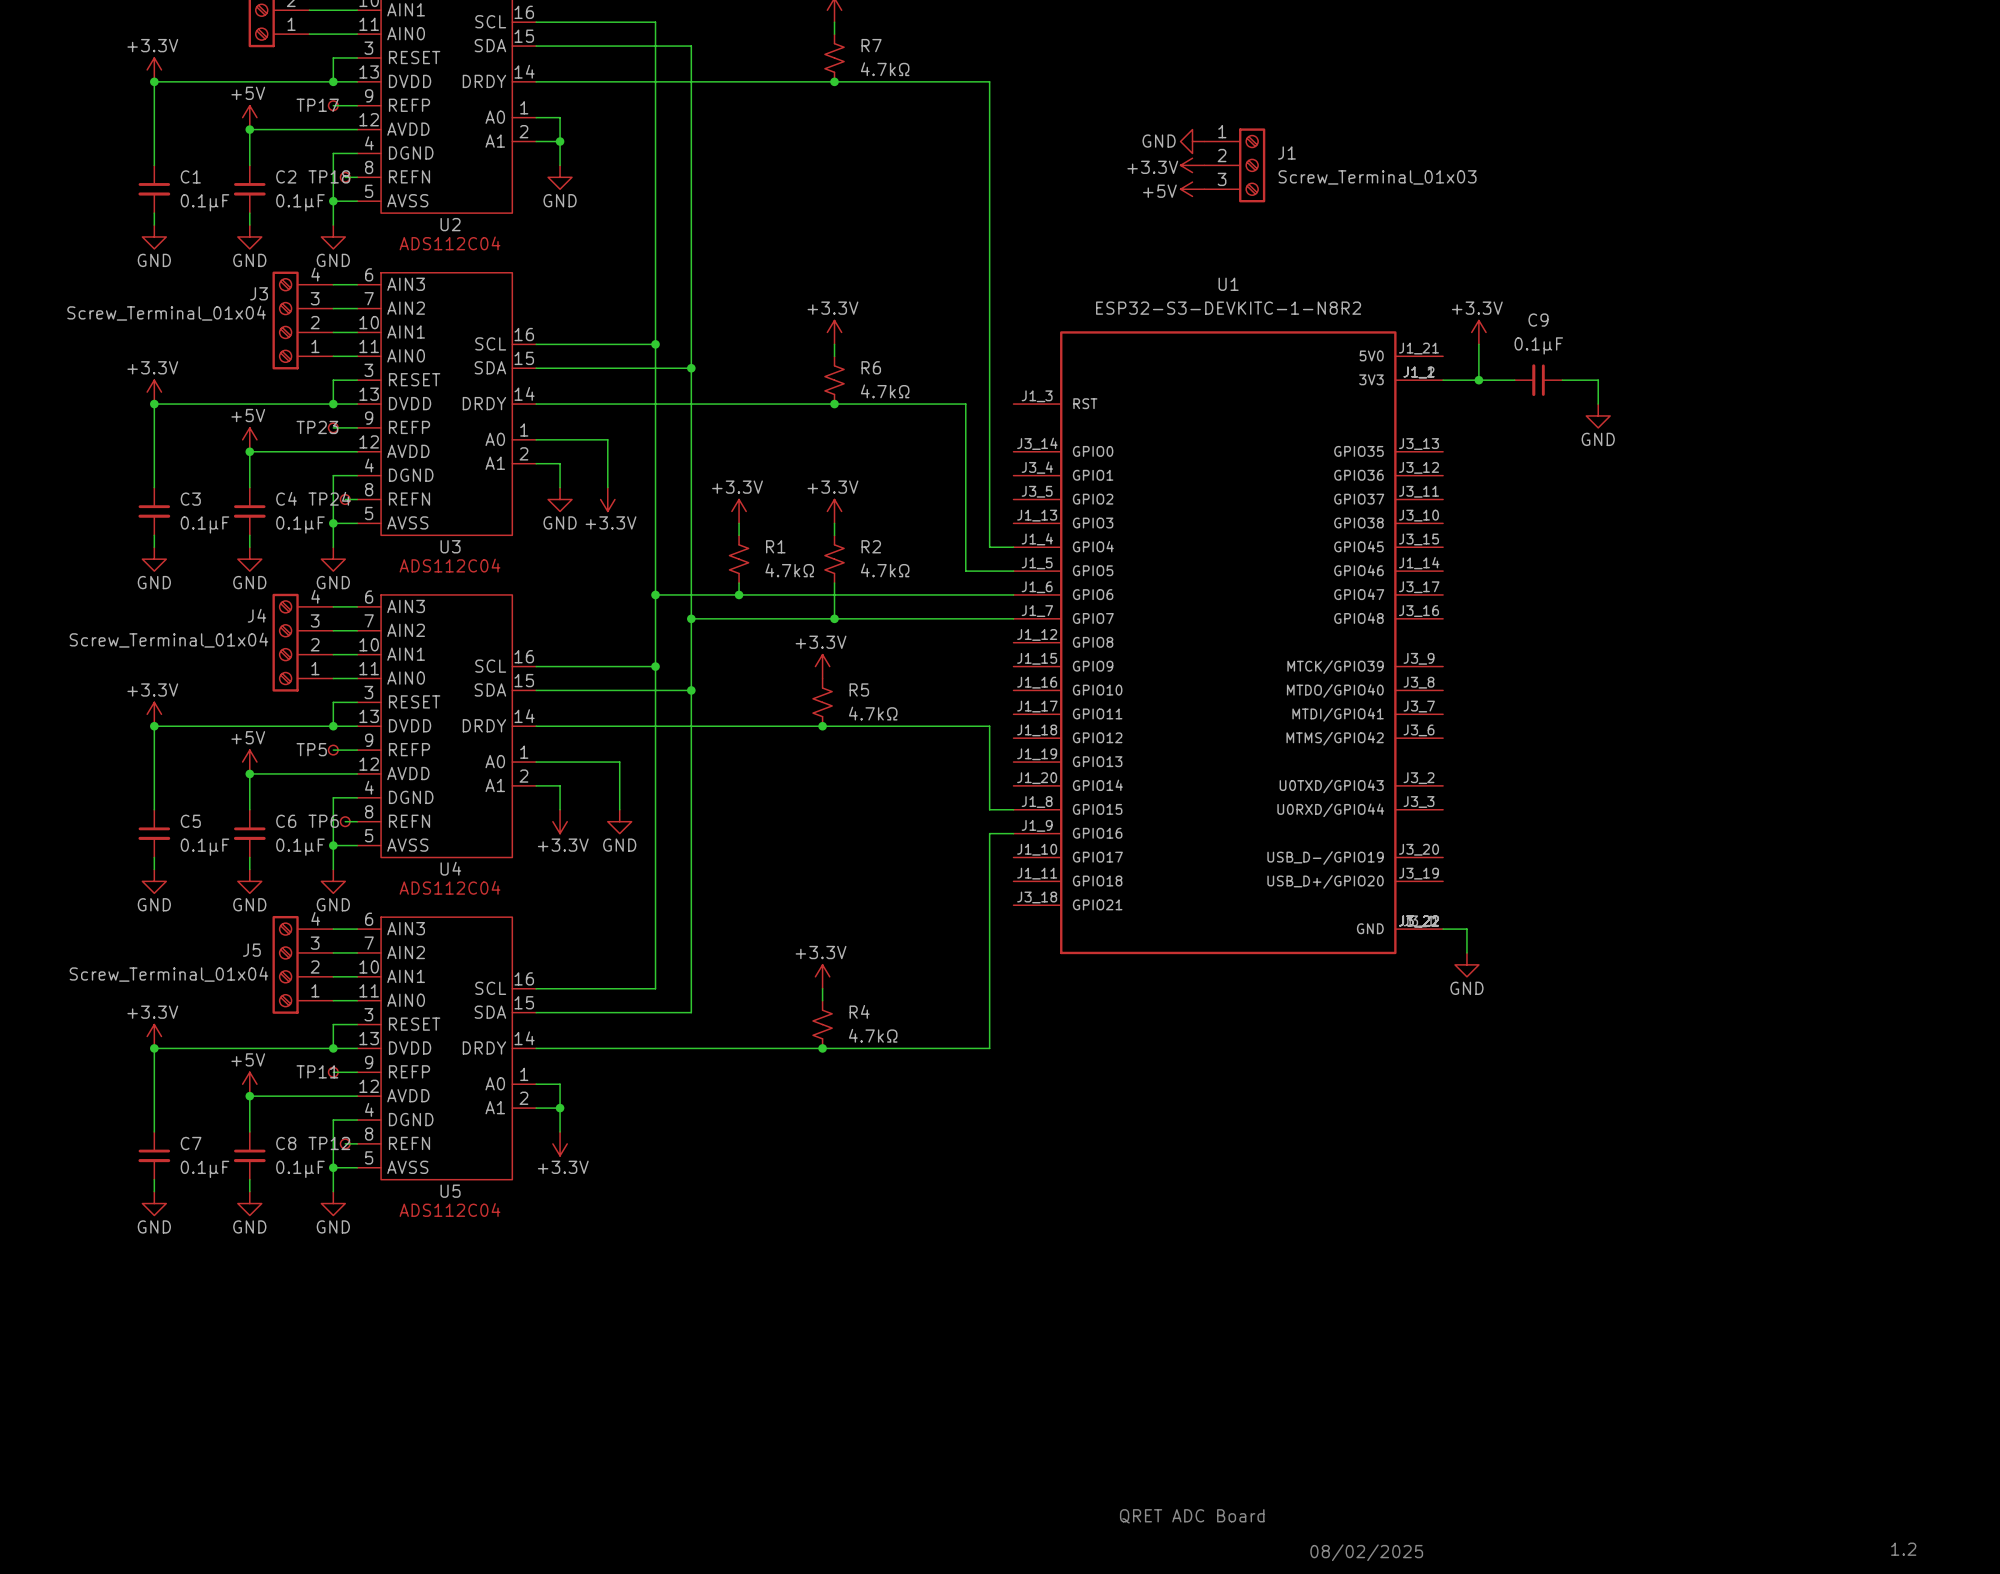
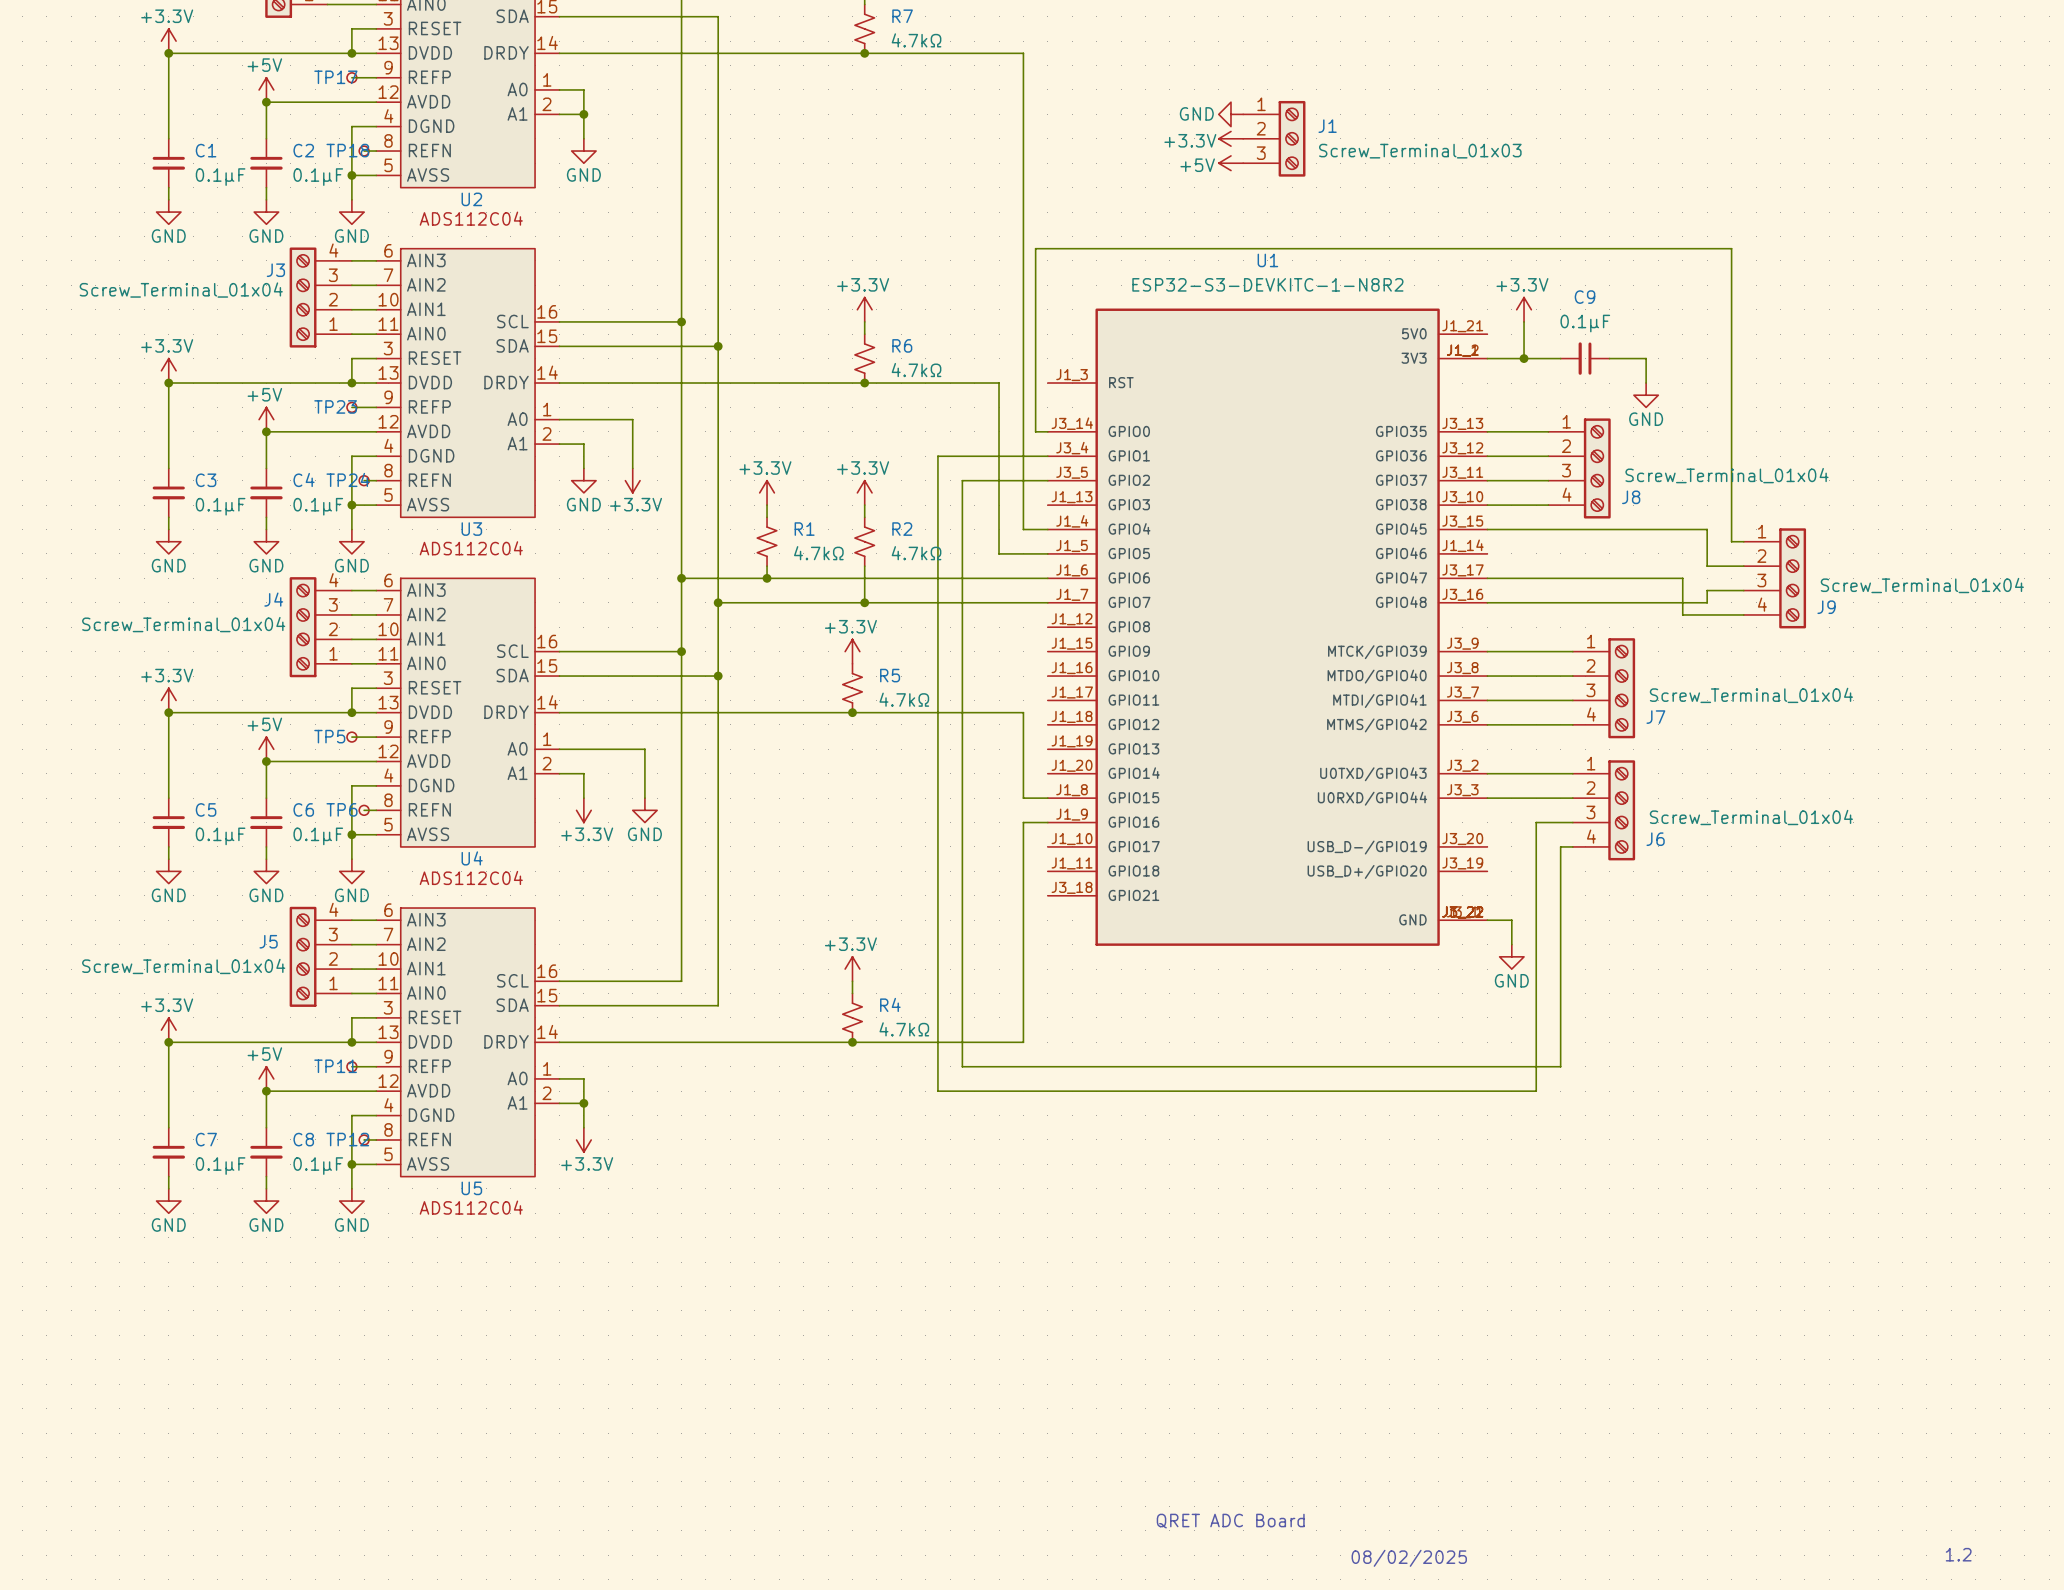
wire: none -> (1047, 431) (1035, 431) (1035, 248) (1731, 248) (1731, 541) (1743, 541)
wire: none -> (1487, 431) (1548, 431)
wire: none -> (1047, 456) (937, 456) (937, 1091) (1536, 1091) (1536, 822) (1572, 822)
wire: none -> (1487, 456) (1548, 456)
J8: none -> Screw_Terminal_01x04 (1579, 468)
wire: none -> (1047, 480) (962, 480) (962, 1066) (1560, 1066) (1560, 846) (1572, 846)
wire: none -> (1487, 480) (1548, 480)
wire: none -> (1487, 505) (1548, 505)
wire: none -> (1487, 529) (1707, 529) (1707, 566) (1743, 566)
wire: none -> (1487, 578) (1682, 578) (1682, 614) (1743, 614)
J9: none -> Screw_Terminal_01x04 (1774, 578)
wire: none -> (1743, 590) (1707, 590) (1707, 602) (1487, 602)
wire: none -> (1487, 651) (1572, 651)
wire: none -> (1487, 676) (1572, 676)
J7: none -> Screw_Terminal_01x04 (1603, 688)
wire: none -> (1487, 700) (1572, 700)
wire: none -> (1487, 724) (1572, 724)
wire: none -> (1487, 773) (1572, 773)
wire: none -> (1487, 798) (1572, 798)
J6: none -> Screw_Terminal_01x04 (1603, 810)

